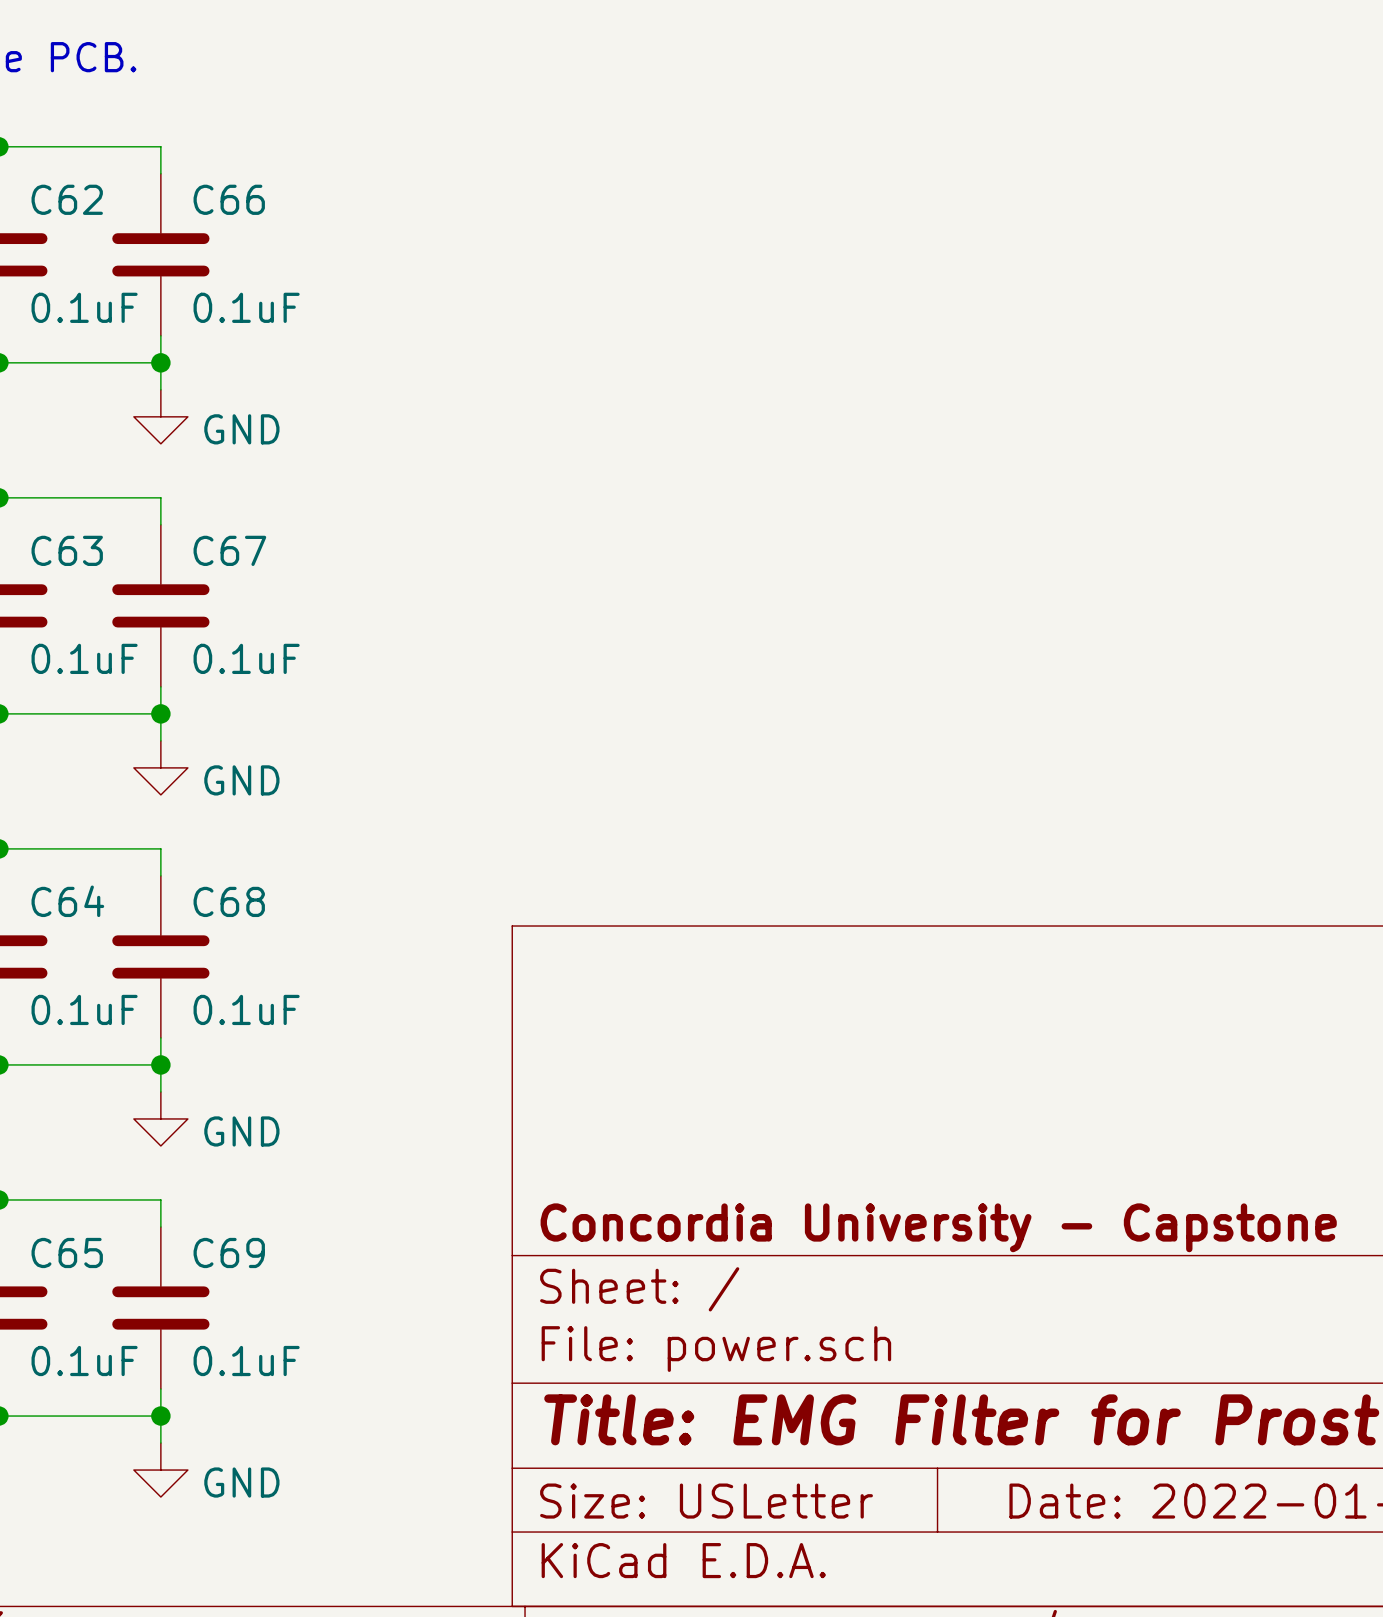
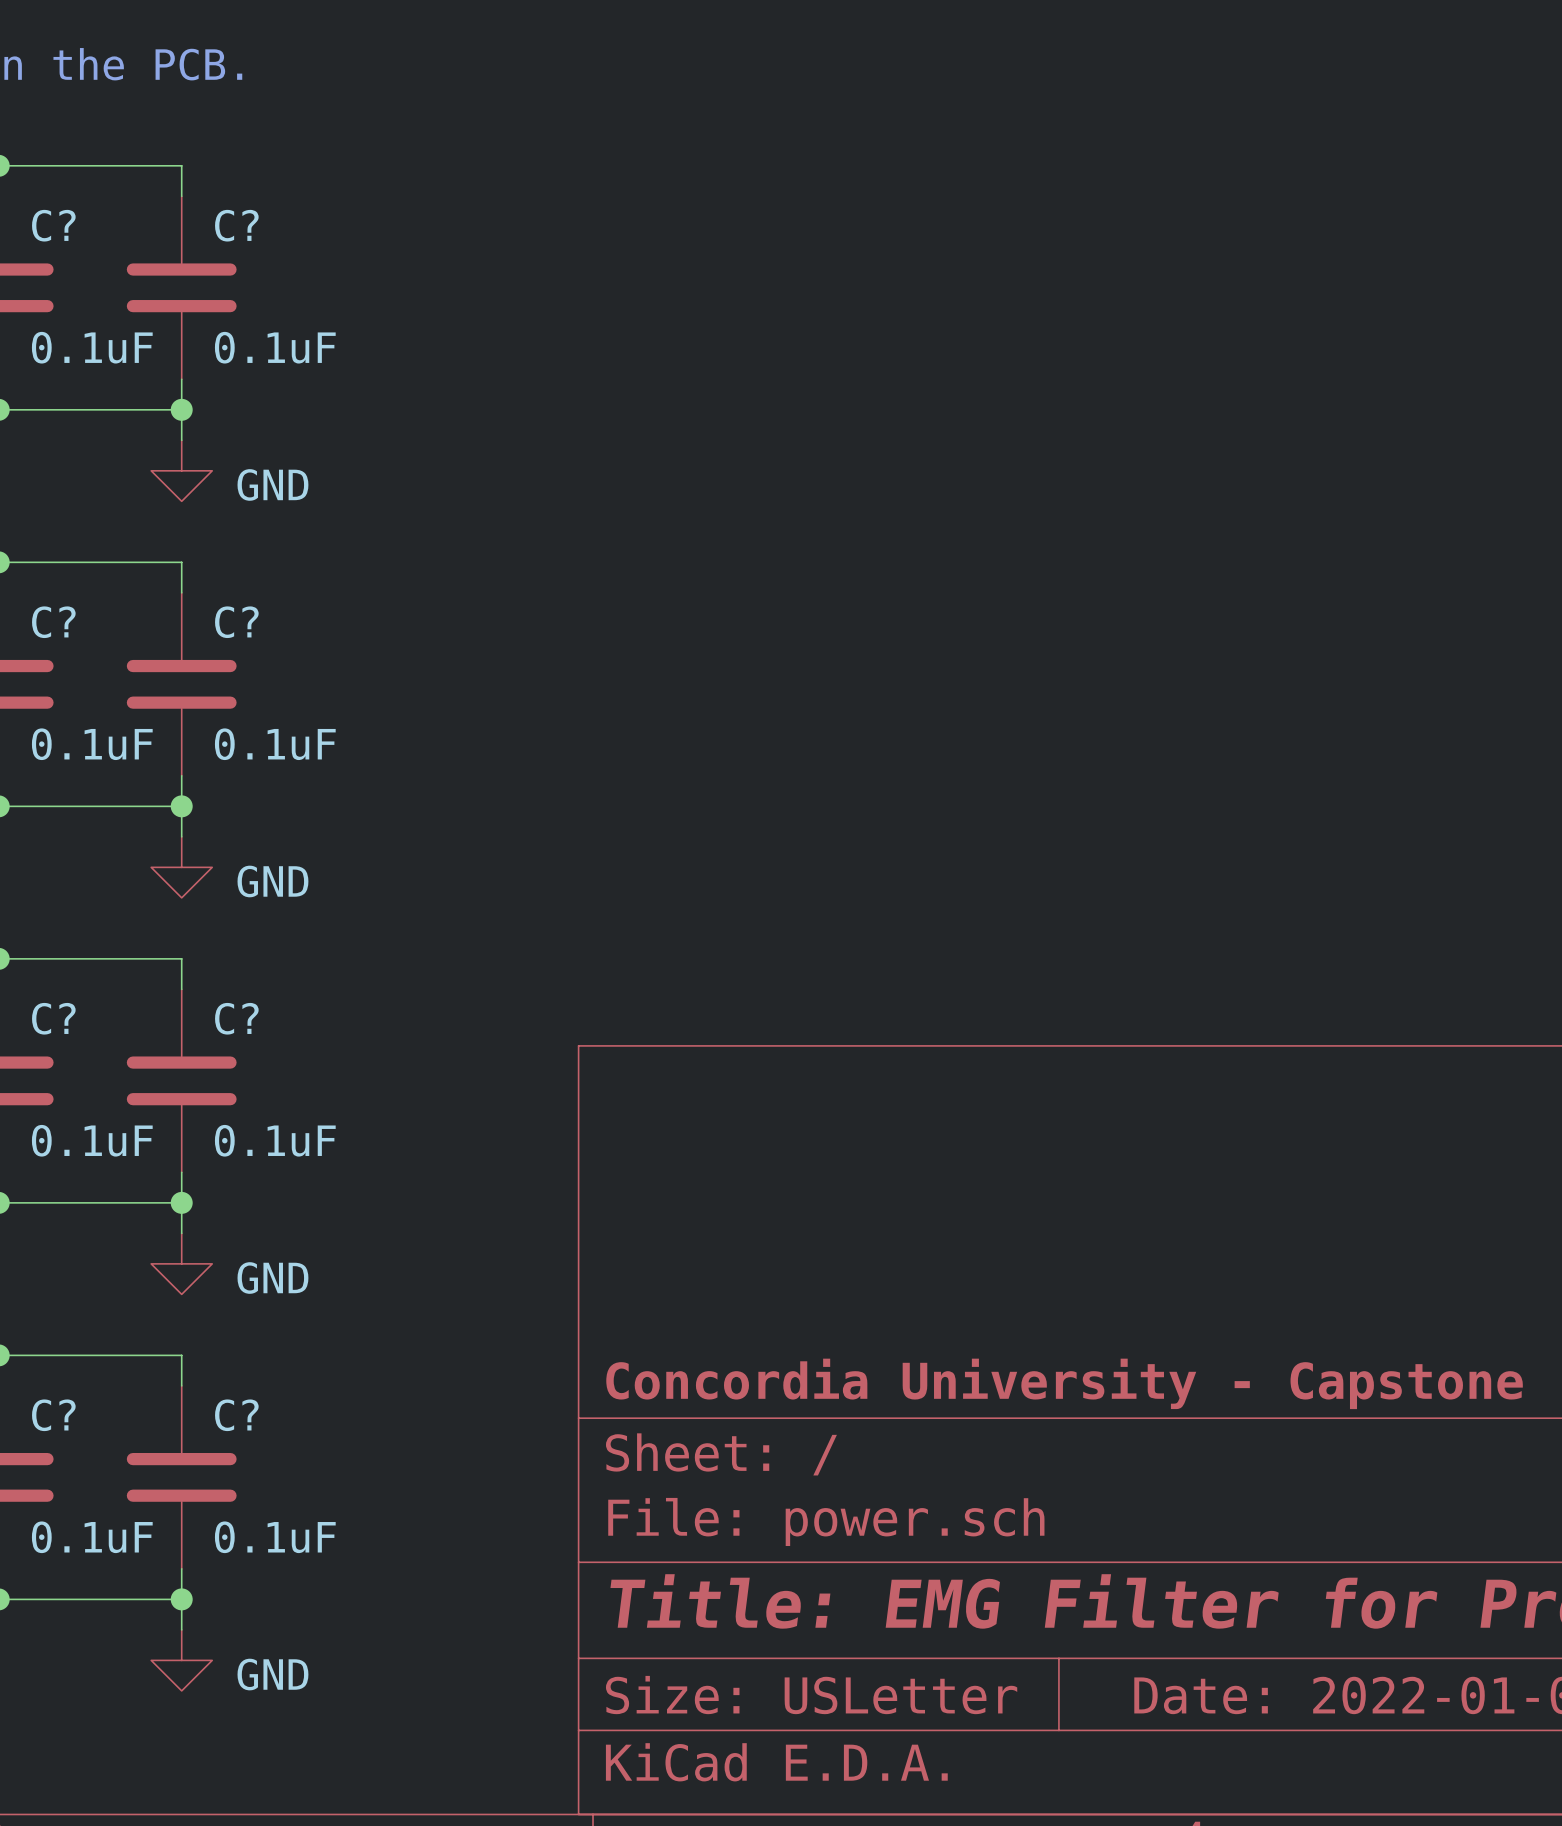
C62 name: C62 (67, 199) -> C? (53, 225)
C66 name: C66 (229, 199) -> C? (236, 225)
C63 name: C63 (67, 550) -> C? (53, 622)
C67 name: C67 (229, 550) -> C? (236, 622)
C64 name: C64 (67, 901) -> C? (53, 1018)
C68 name: C68 (229, 901) -> C? (236, 1018)
C65 name: C65 (67, 1252) -> C? (53, 1415)
C69 name: C69 (229, 1252) -> C? (236, 1415)

